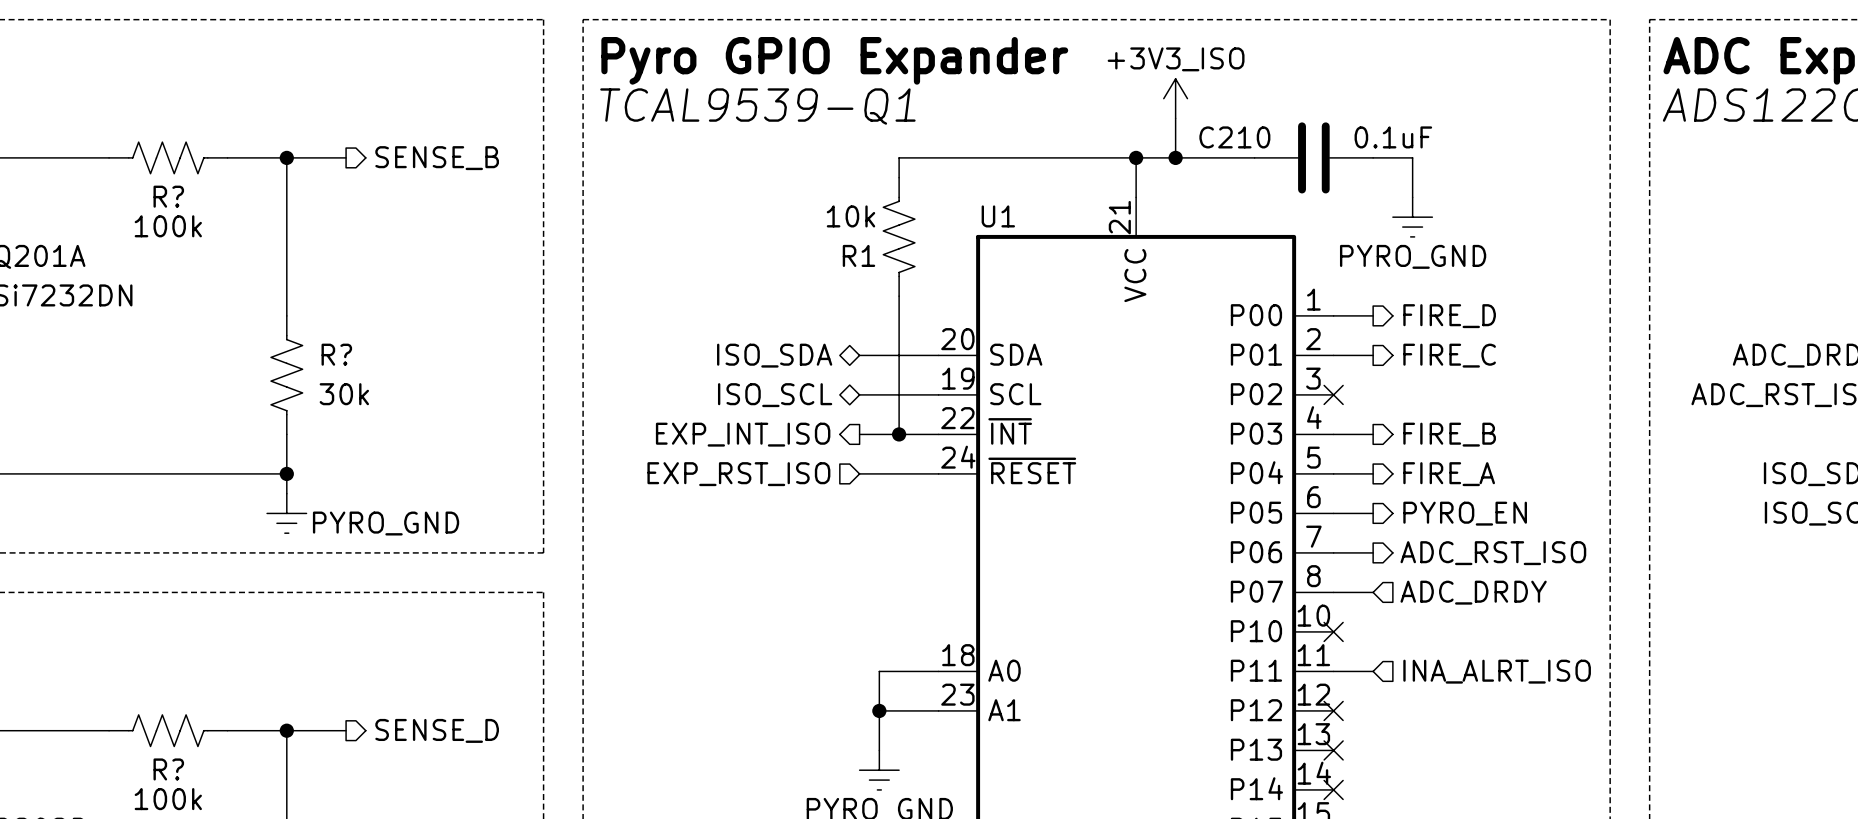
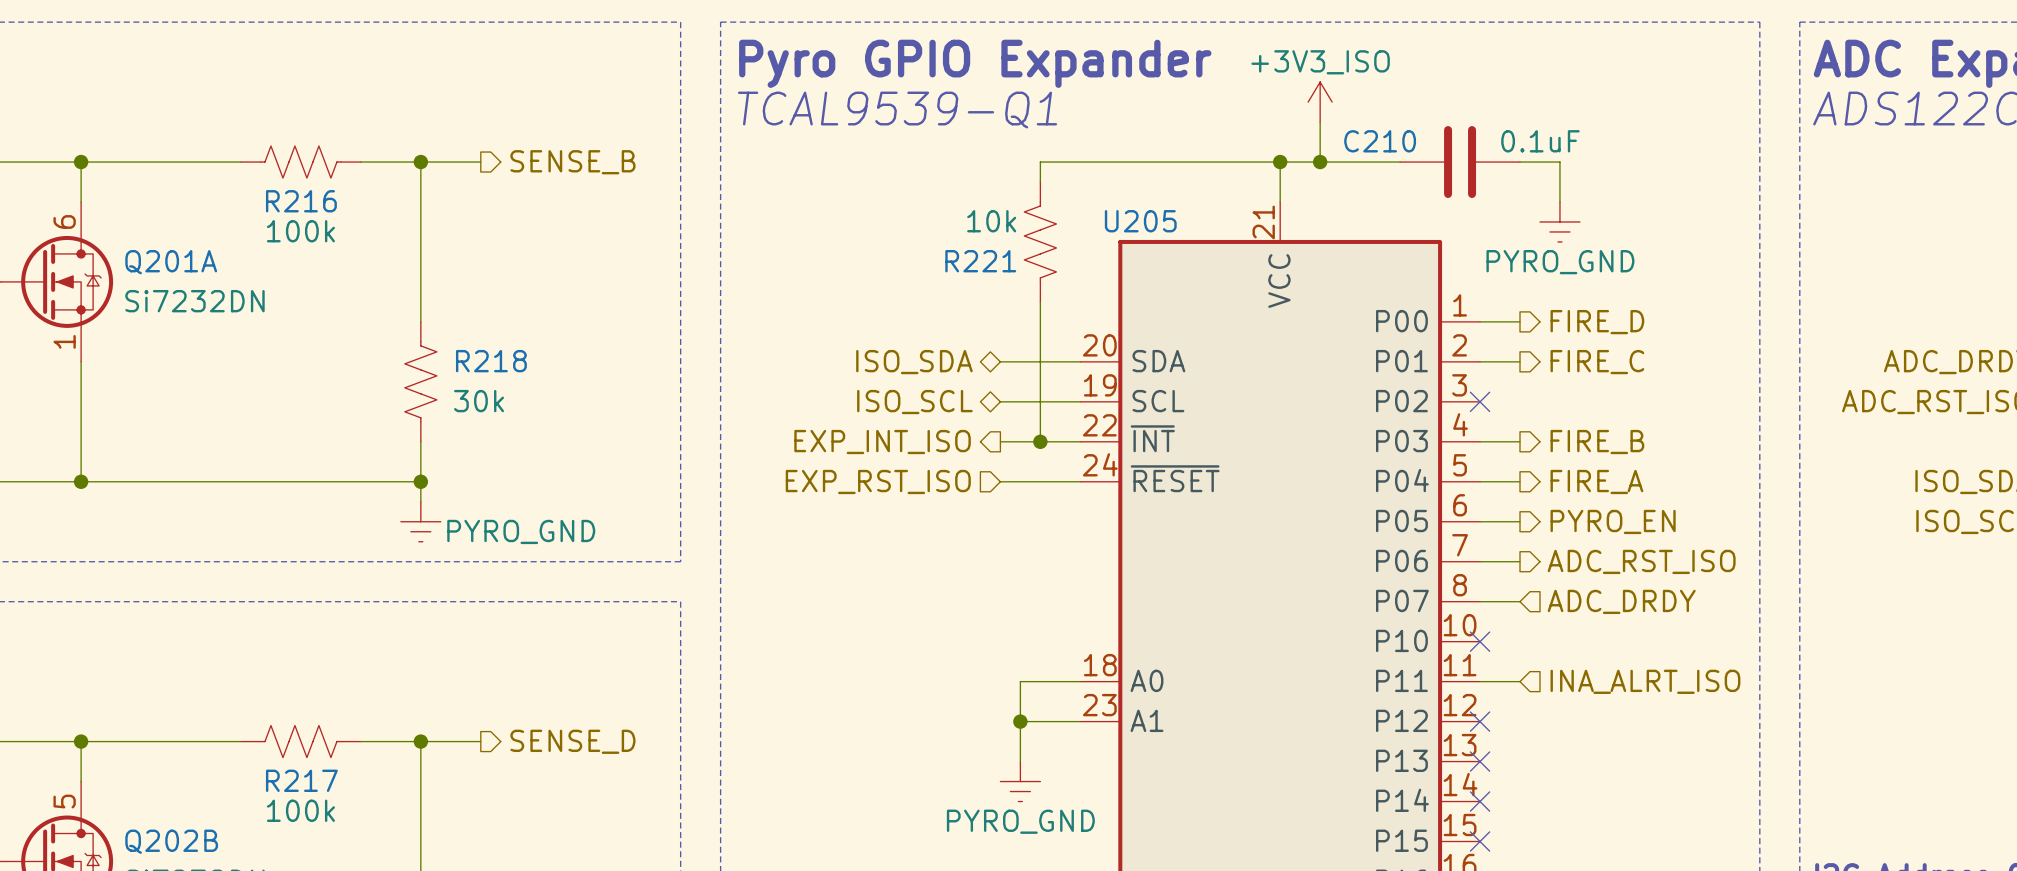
R? name: R? (168, 196) -> R216 (301, 201)
U1 name: U1 (998, 216) -> U205 (1140, 221)
R1 name: R1 (858, 255) -> R221 (980, 261)
R? name: R? (336, 354) -> R218 (491, 361)
R? name: R? (168, 769) -> R217 (301, 780)

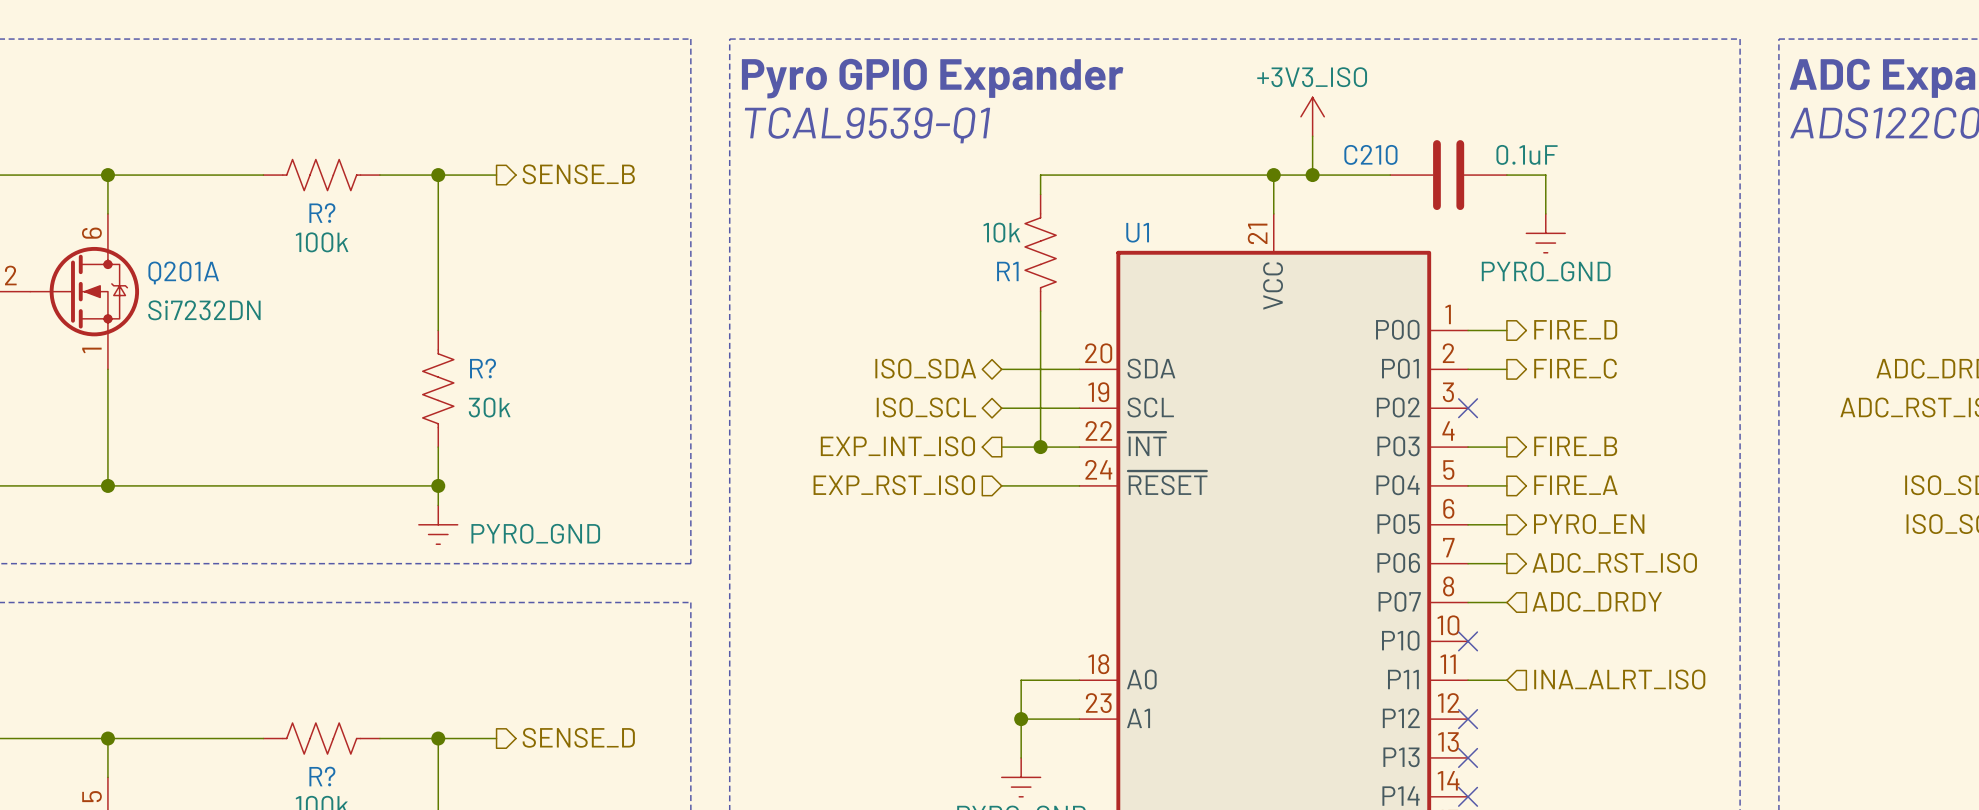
R216 name: R216 (301, 201) -> R? (322, 213)
U205 name: U205 (1140, 221) -> U1 (1137, 232)
R221 name: R221 (980, 261) -> R1 (1007, 271)
R218 name: R218 (491, 361) -> R? (483, 368)
R217 name: R217 (301, 780) -> R? (322, 776)

